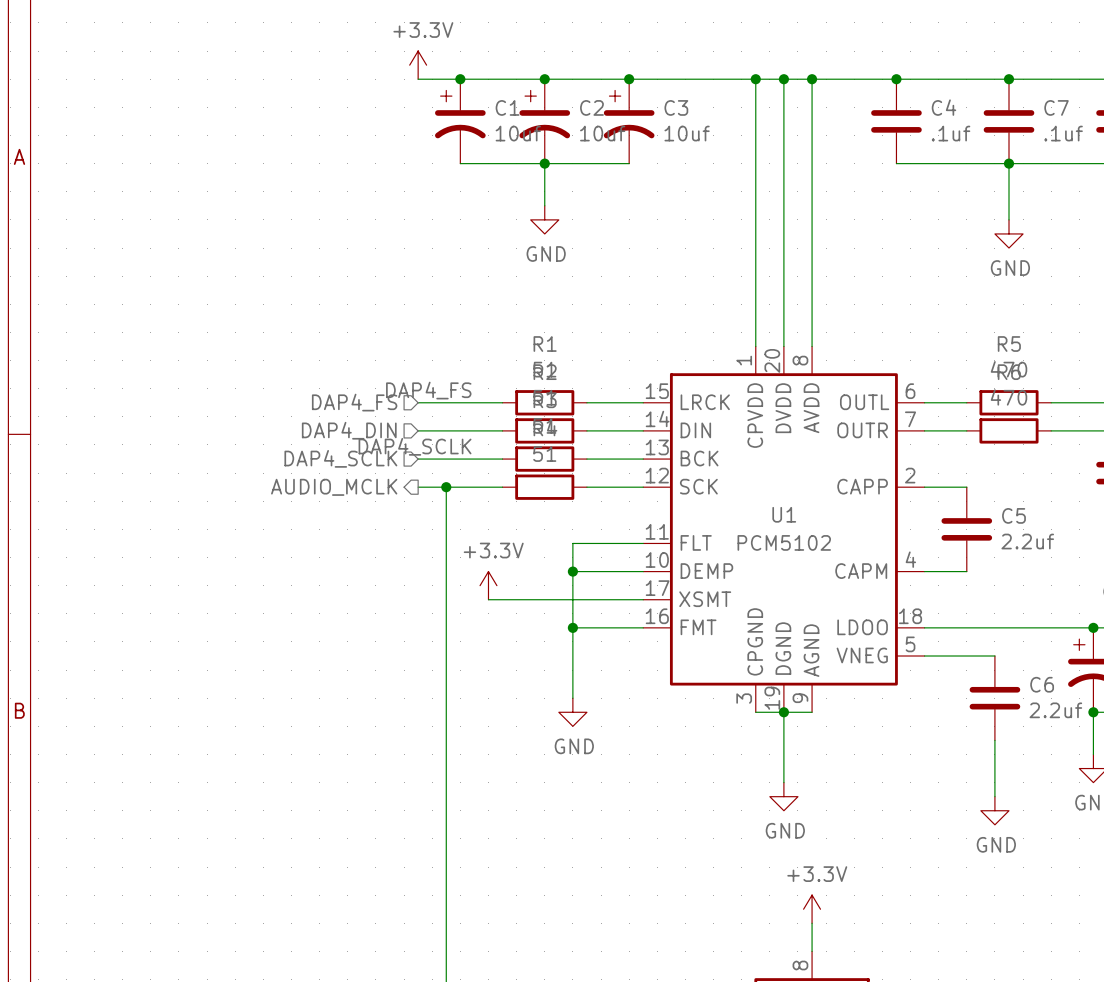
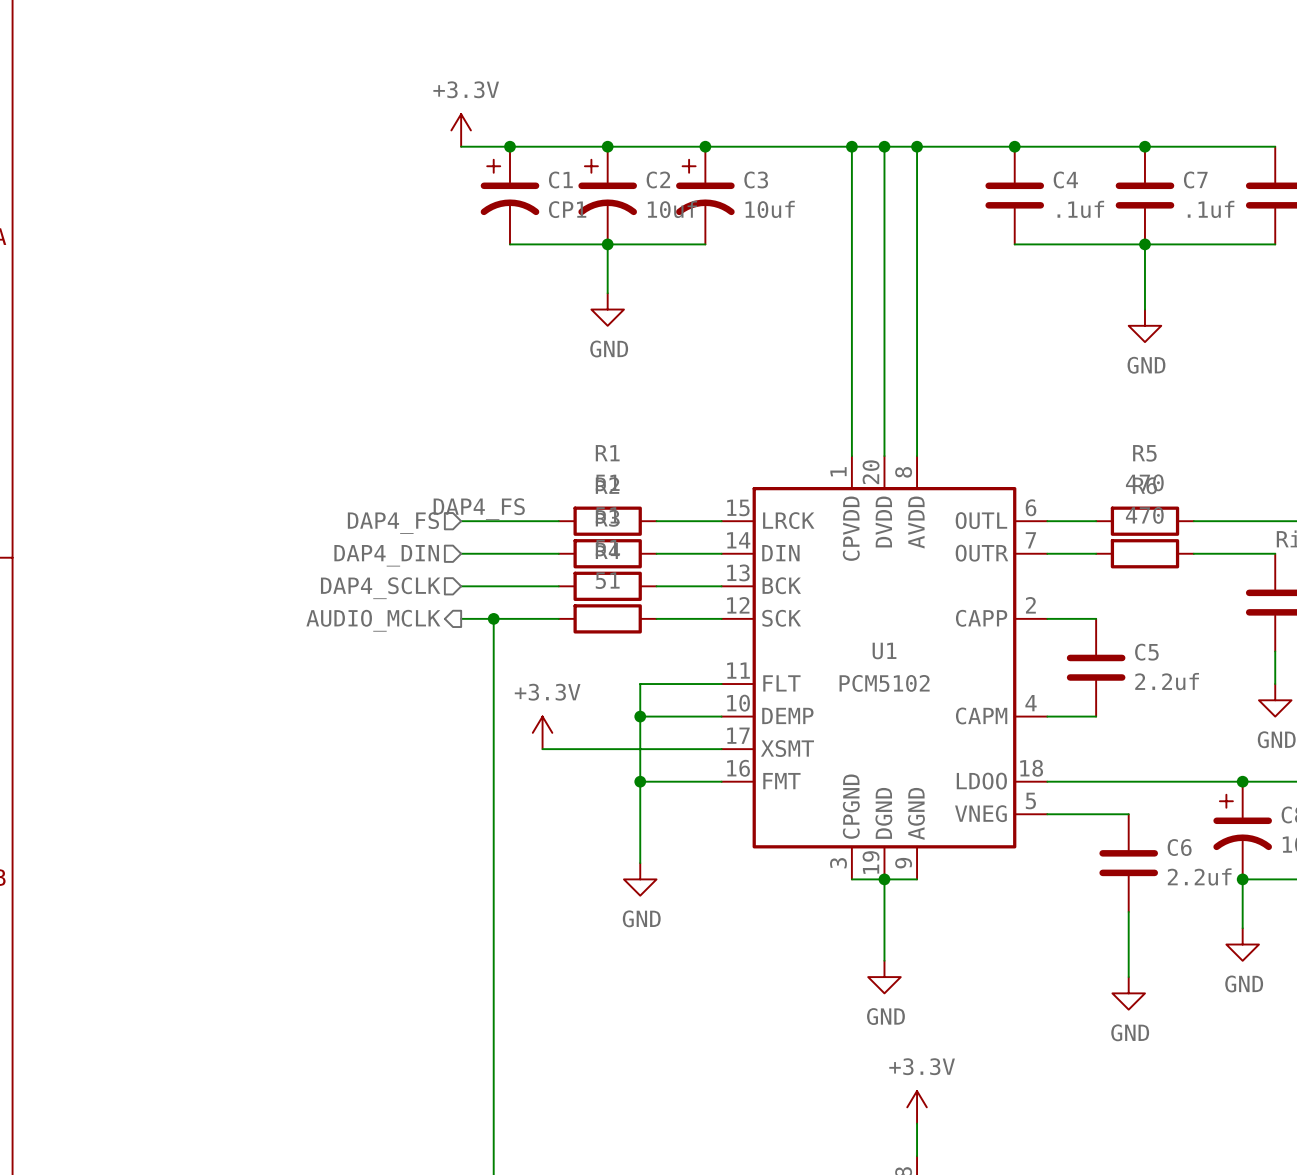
C1 value: 10uf (518, 133) -> CP1 (567, 209)
label: DAP4_SCLK (415, 446) -> none

